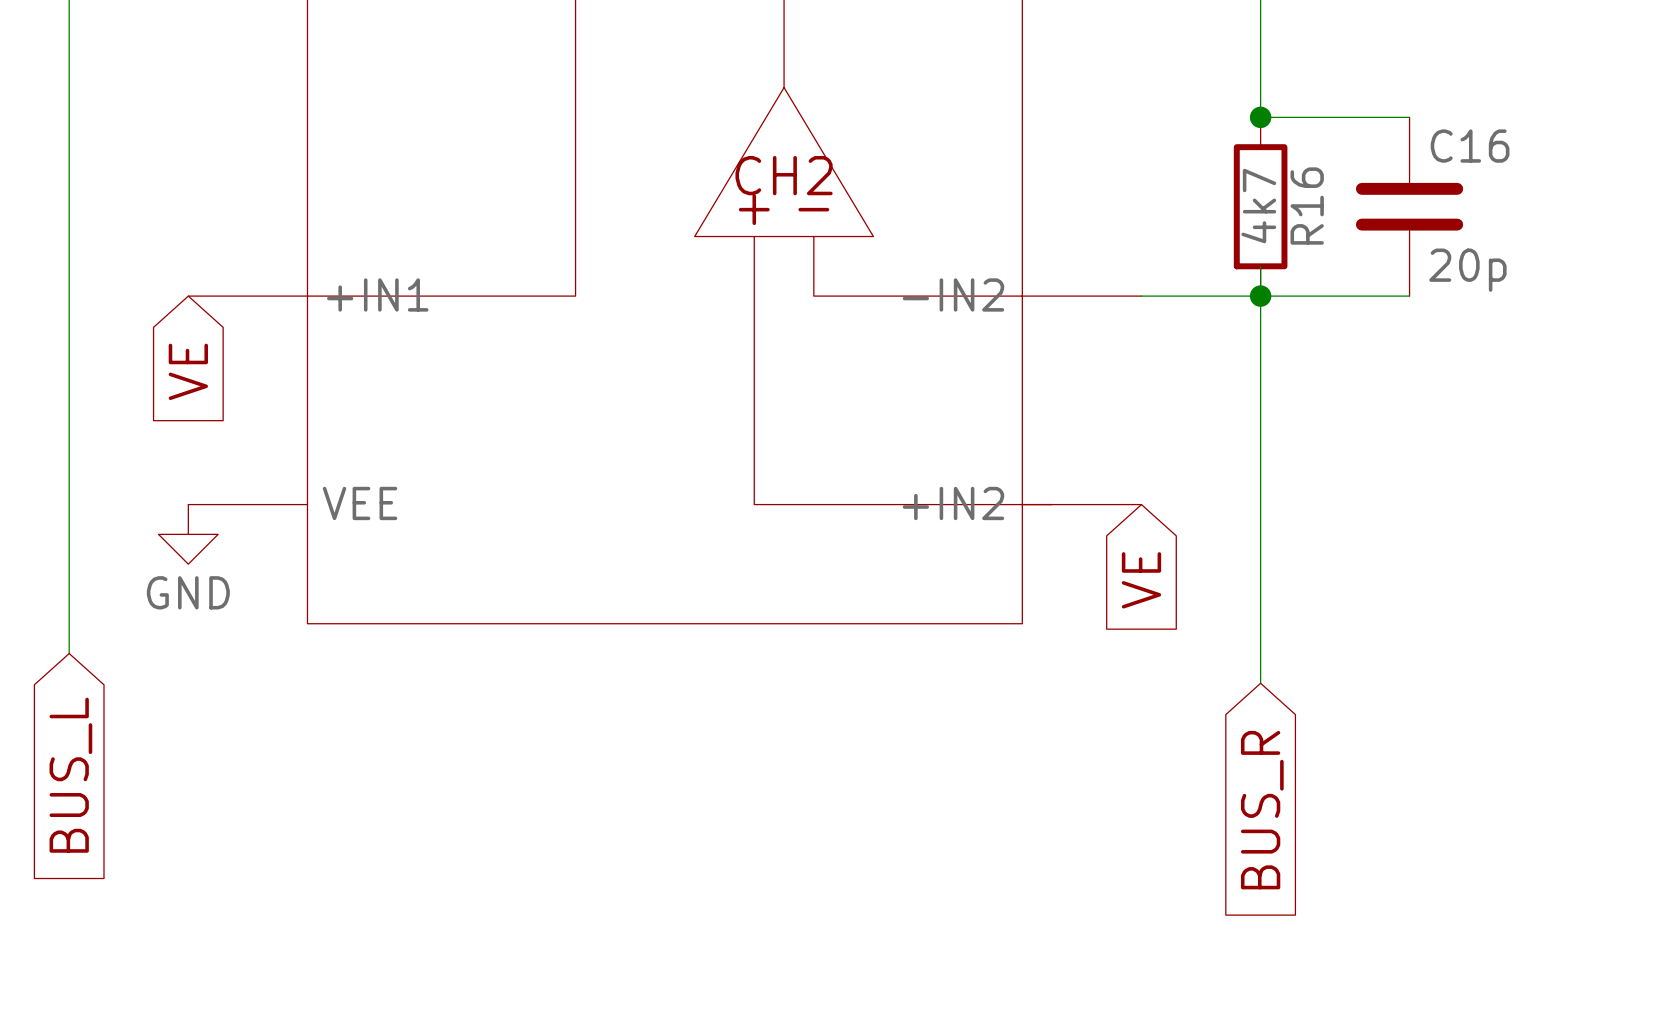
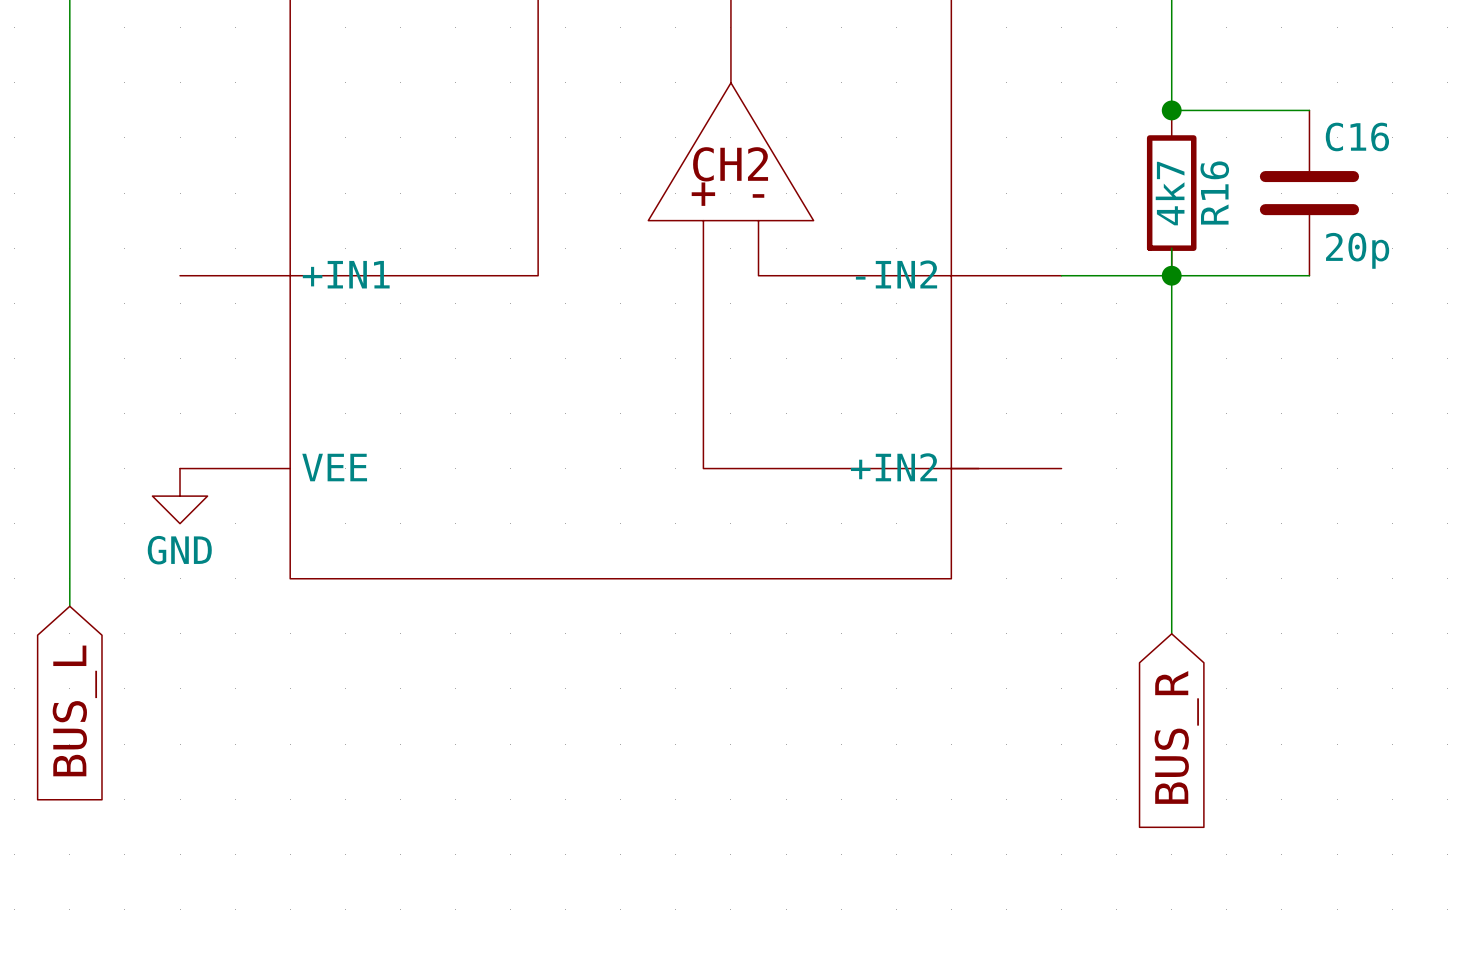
global label: VE (188, 371) -> none
global label: VE (1141, 580) -> none

